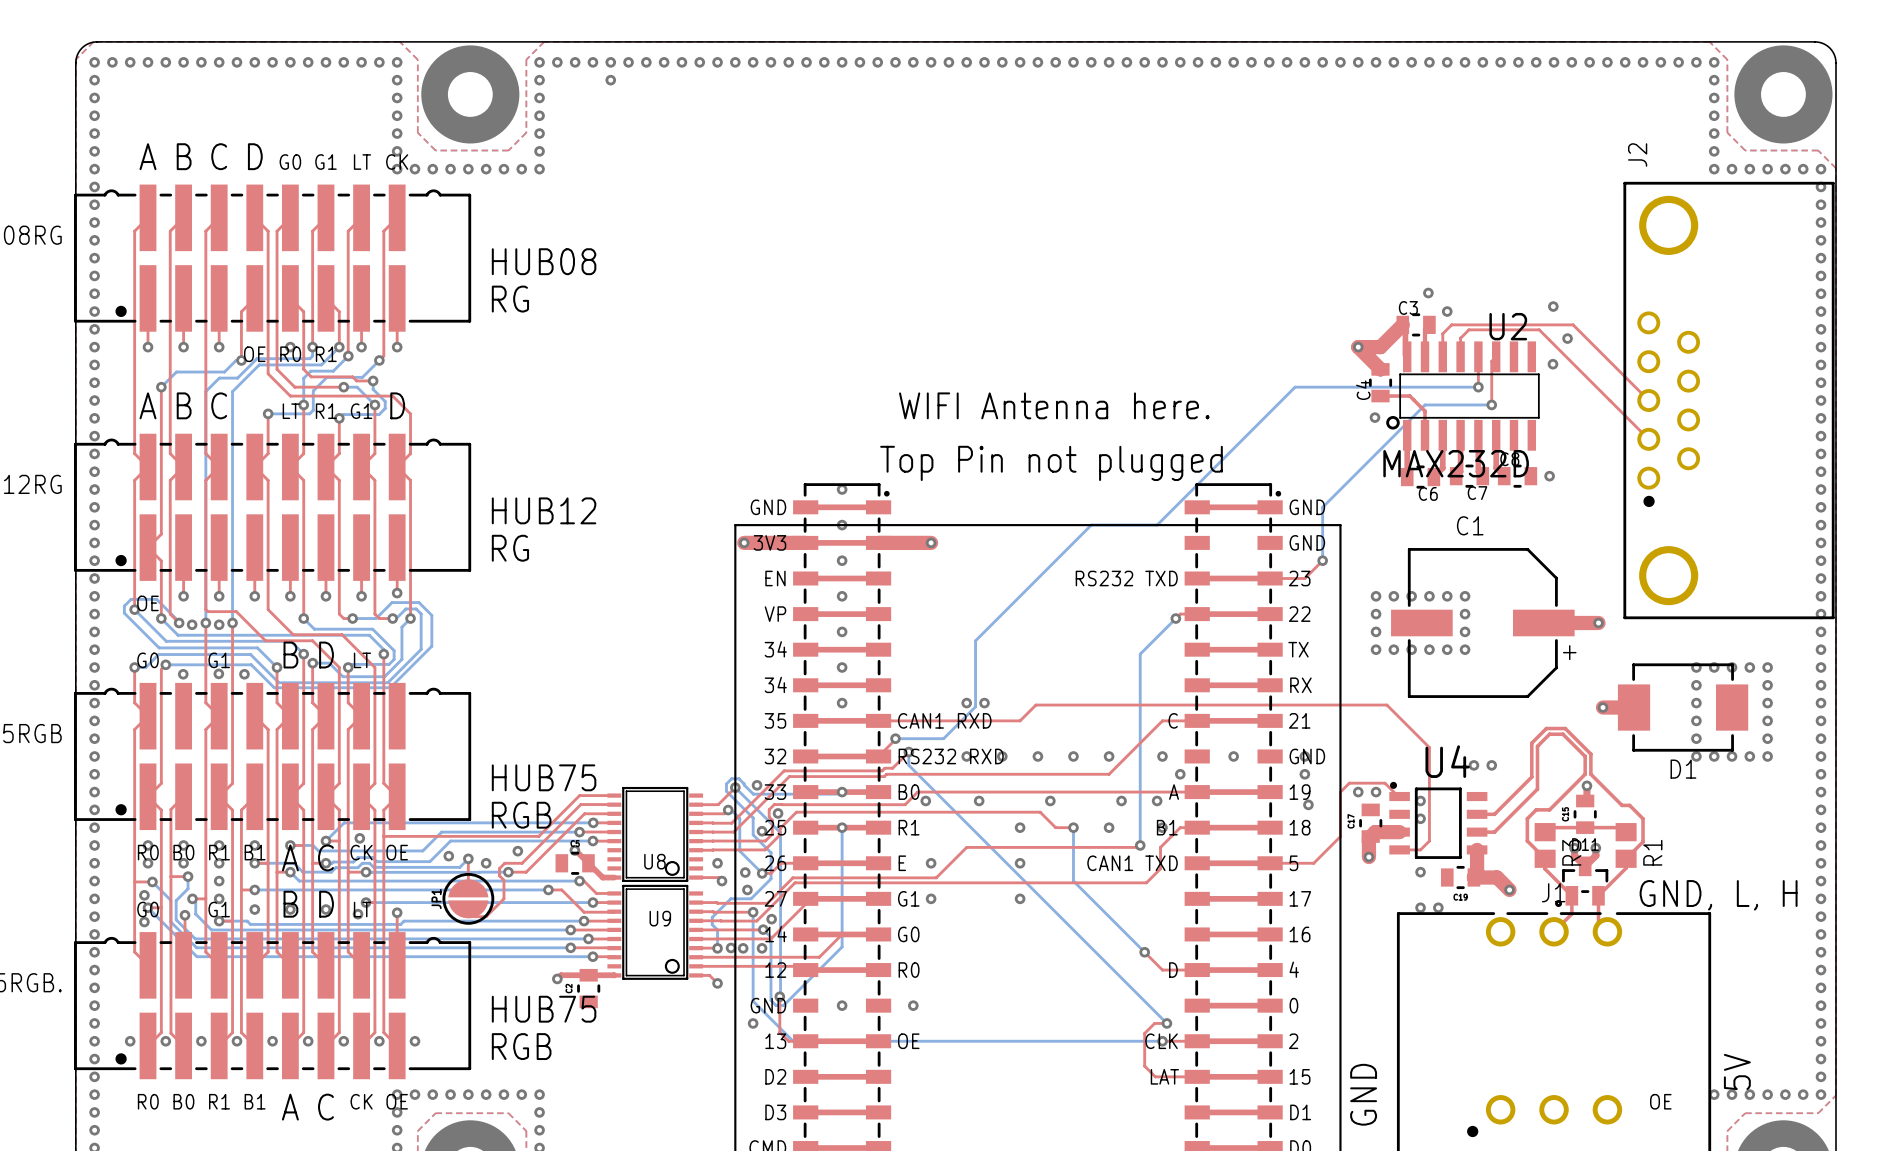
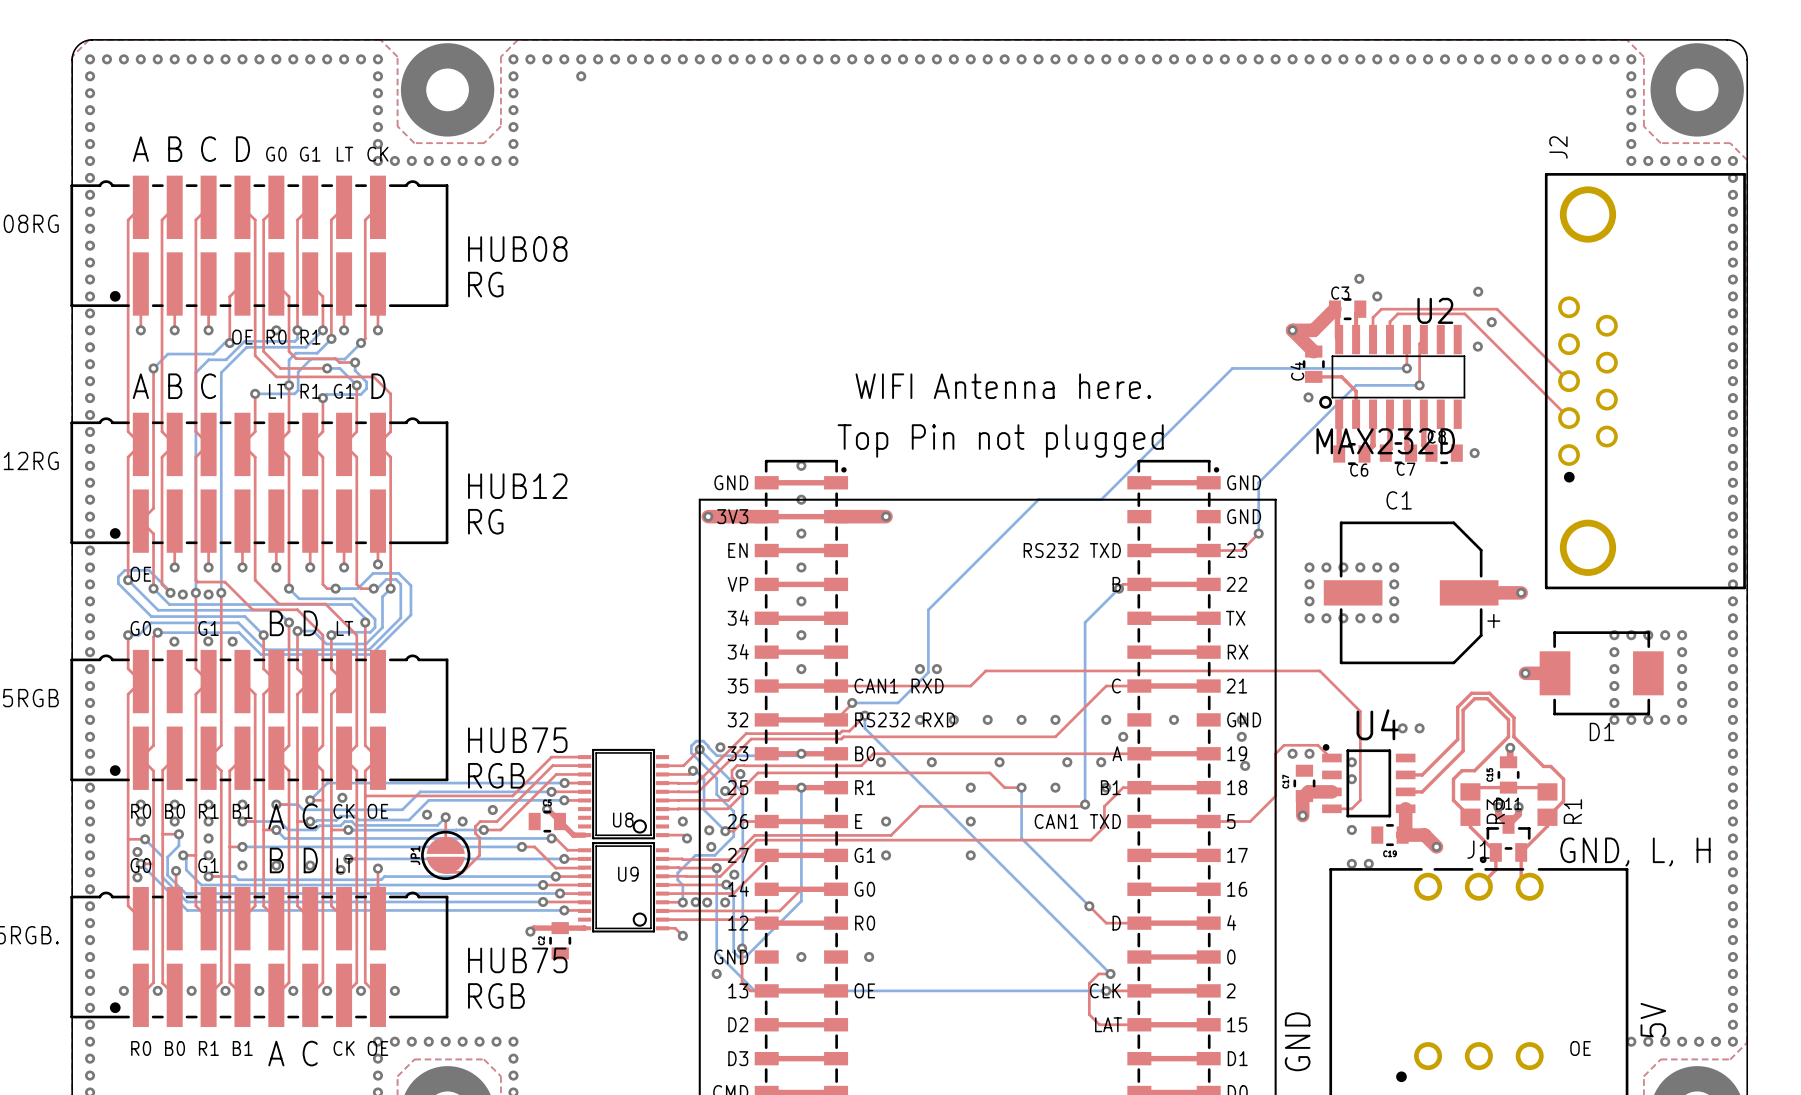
text: none -> B (1116, 584)

